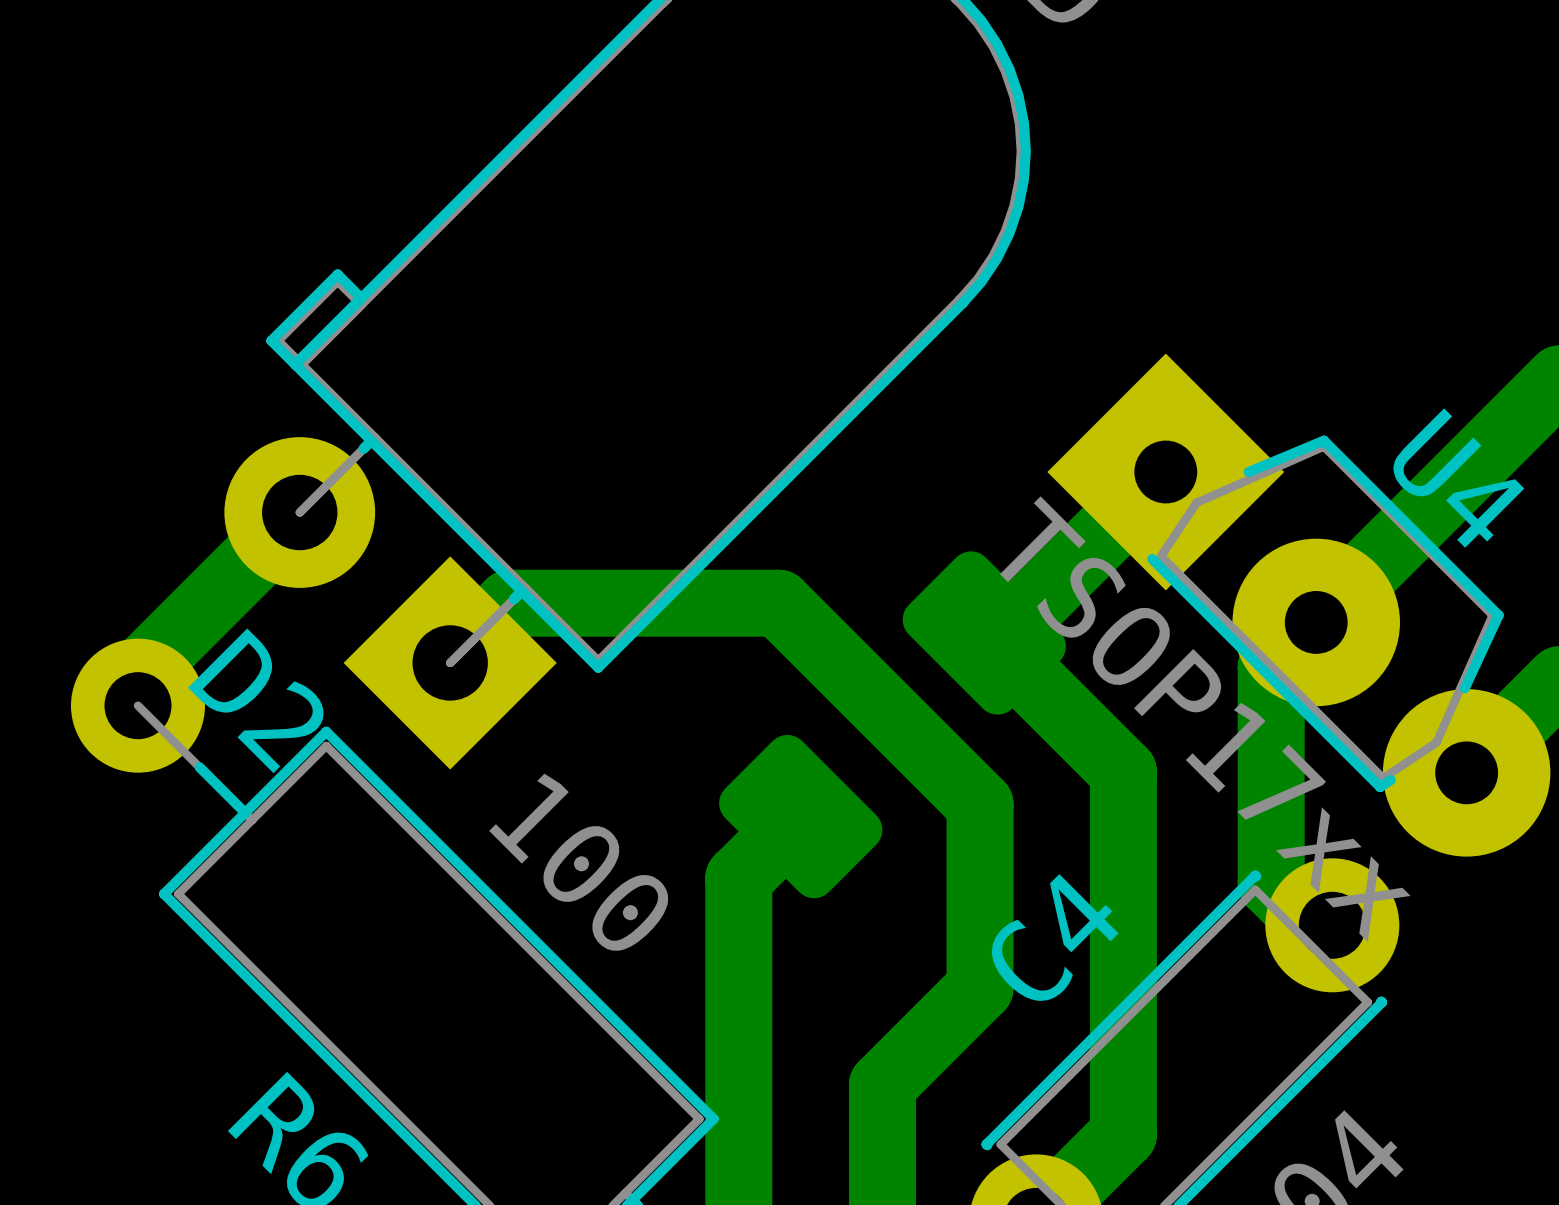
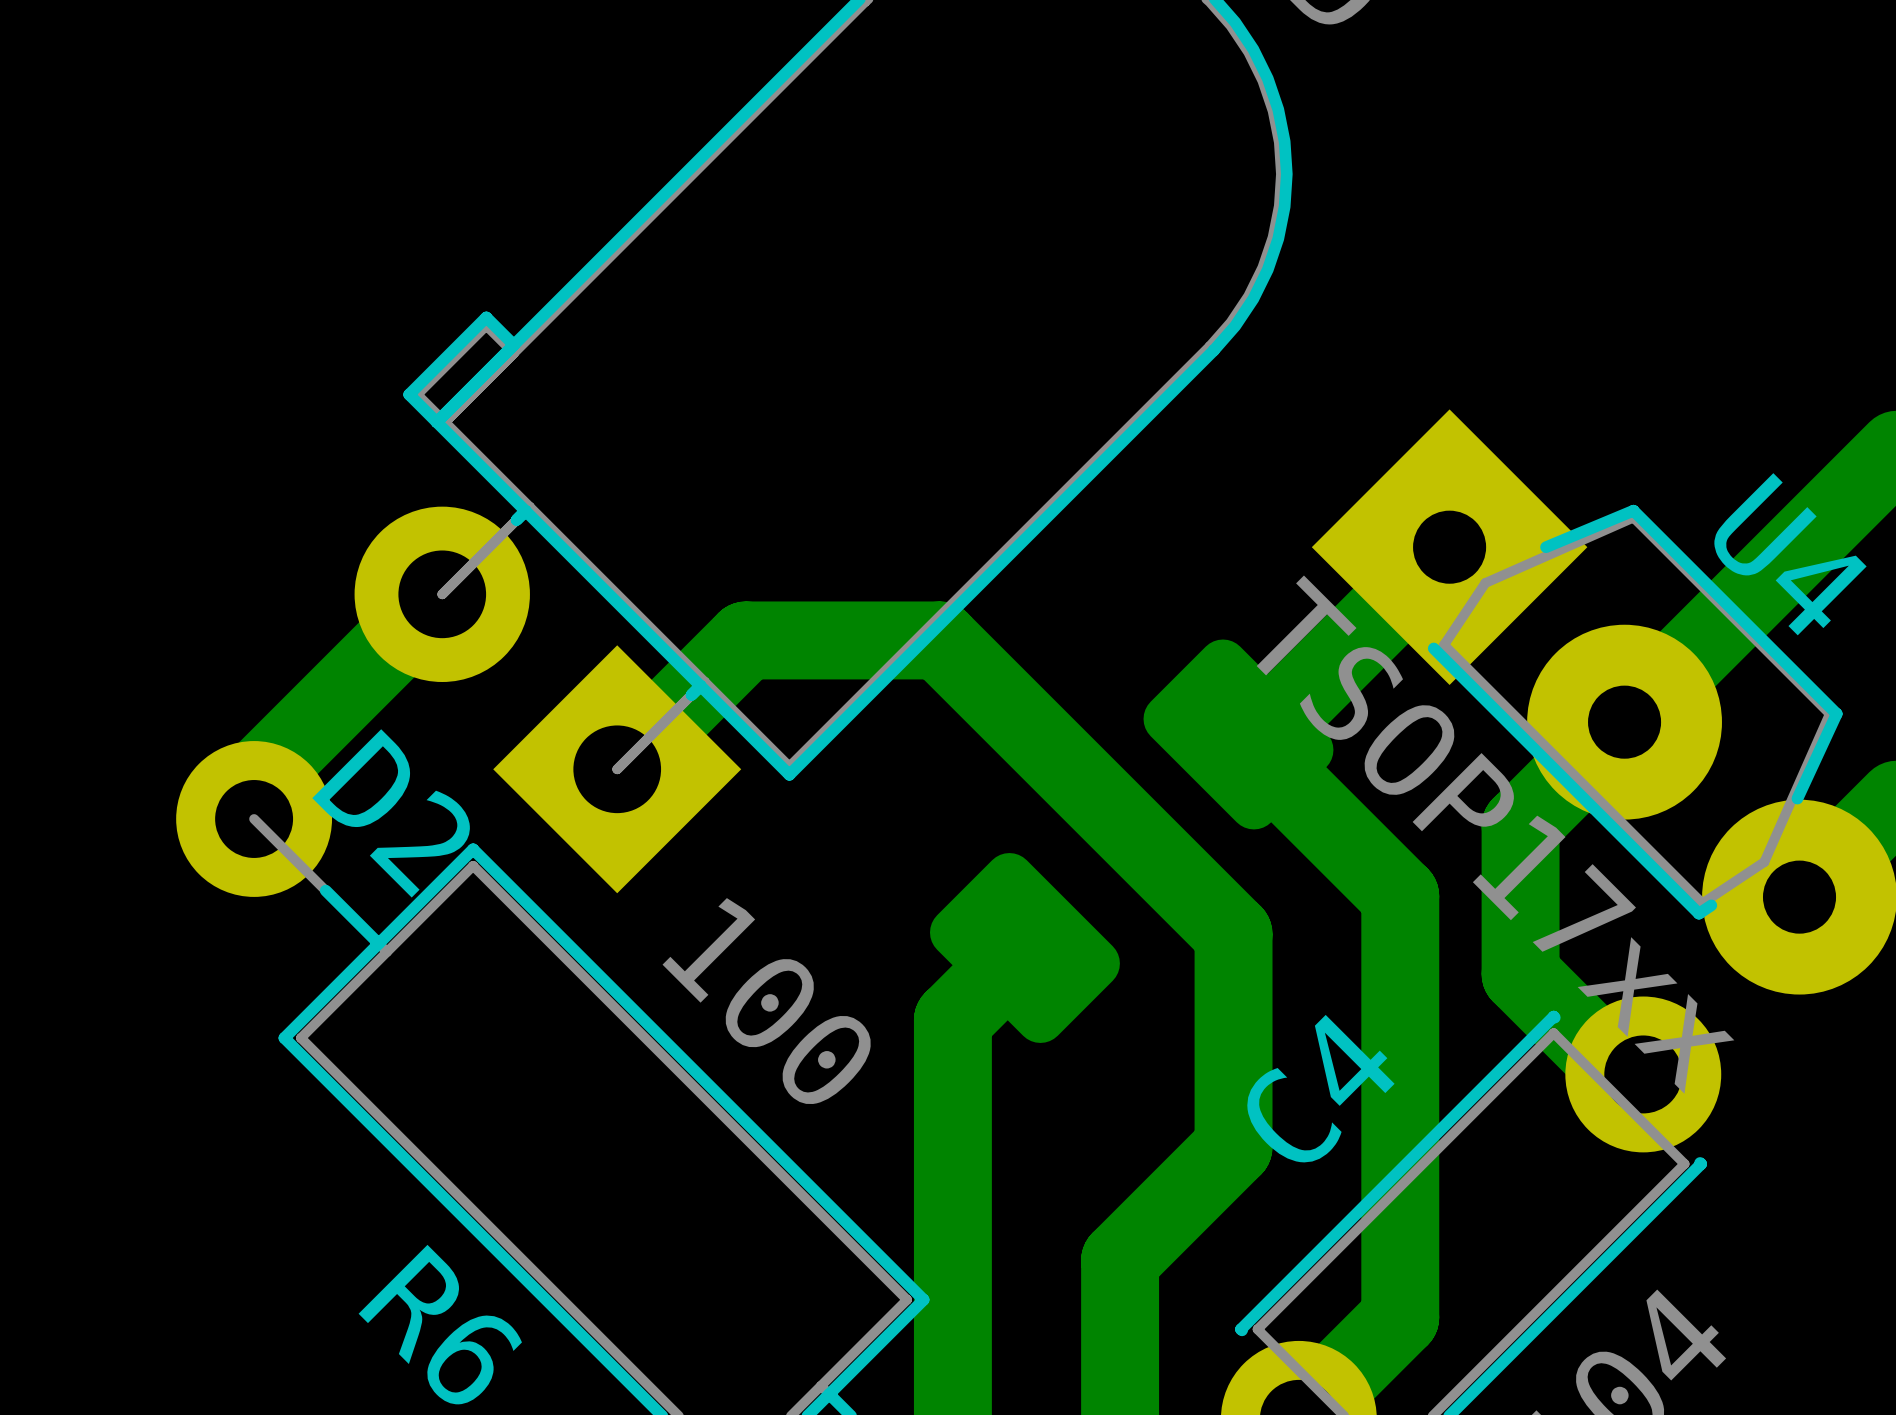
bottom track: (509, 603) (778, 603) -> (686, 699) (746, 640) (939, 640) (999, 699)
bottom track: (1271, 667) (1271, 883) -> (1572, 774) (1520, 826) (1520, 974) (1572, 1025)

